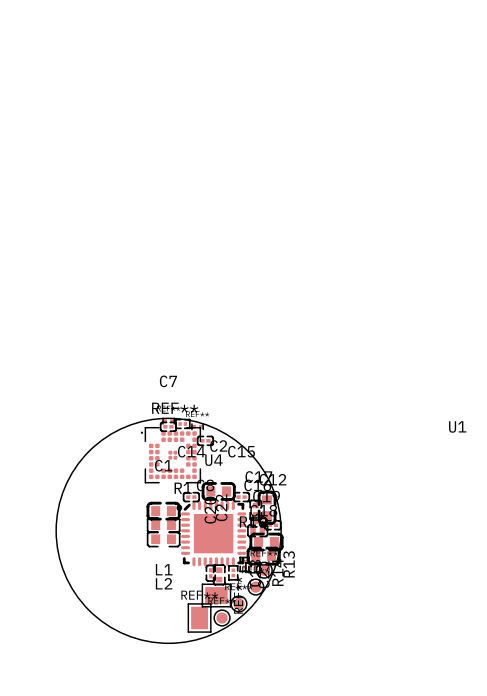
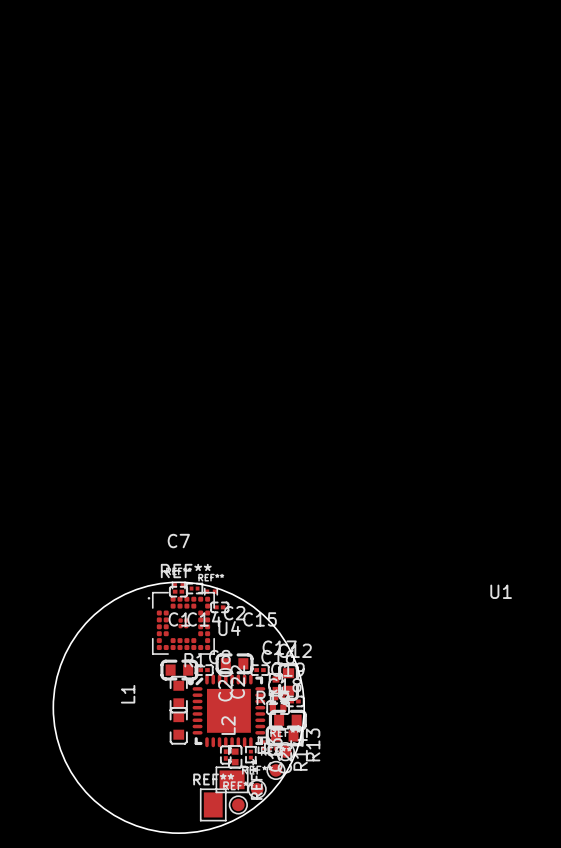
C1 position: (163, 511) -> (179, 670)
L1 rotation: 0° (163, 525) -> 90° clockwise (178, 694)
L2 rotation: 0° (163, 539) -> 90° counterclockwise (178, 725)

